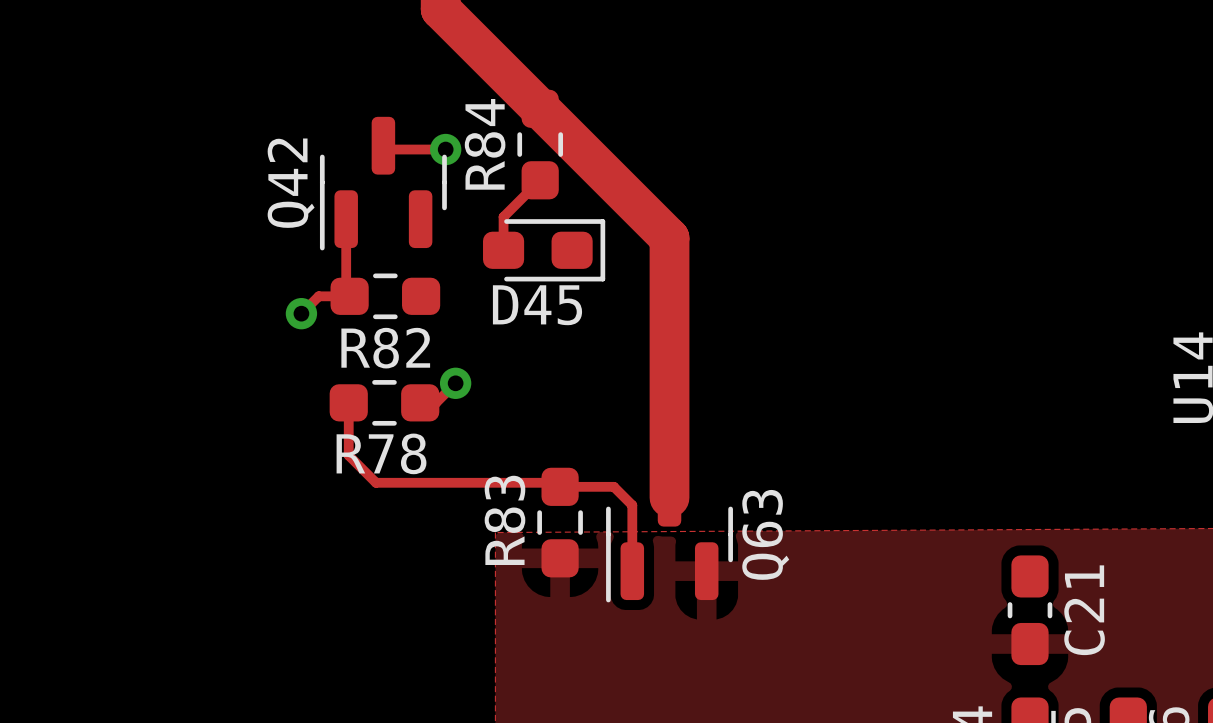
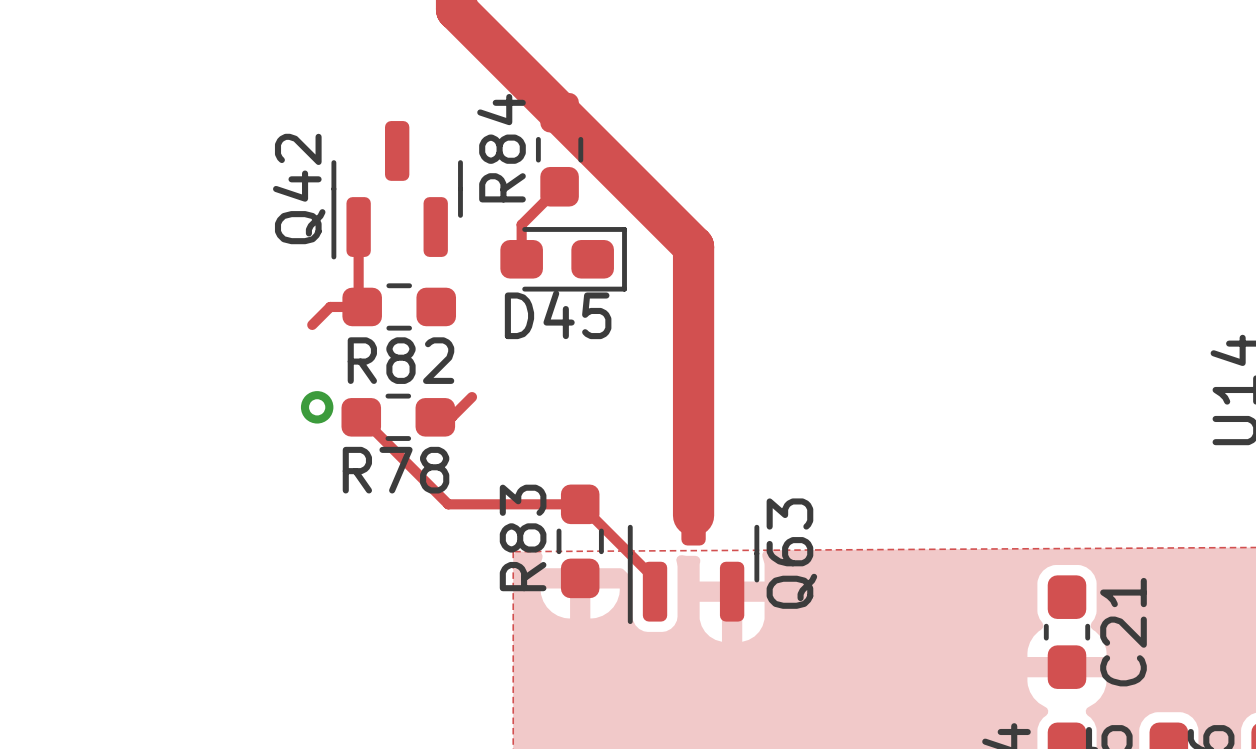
track: (383, 145) (387, 149) (445, 149) -> none
via: (445, 149) -> none
via: (301, 313) -> none
via: (455, 383) -> none
via: none -> (317, 407)
track: (348, 402) (348, 455) (376, 482) (556, 482) (560, 486) (613, 486) (632, 505) (632, 559) -> (361, 417) (448, 504) (580, 504) (655, 579)

